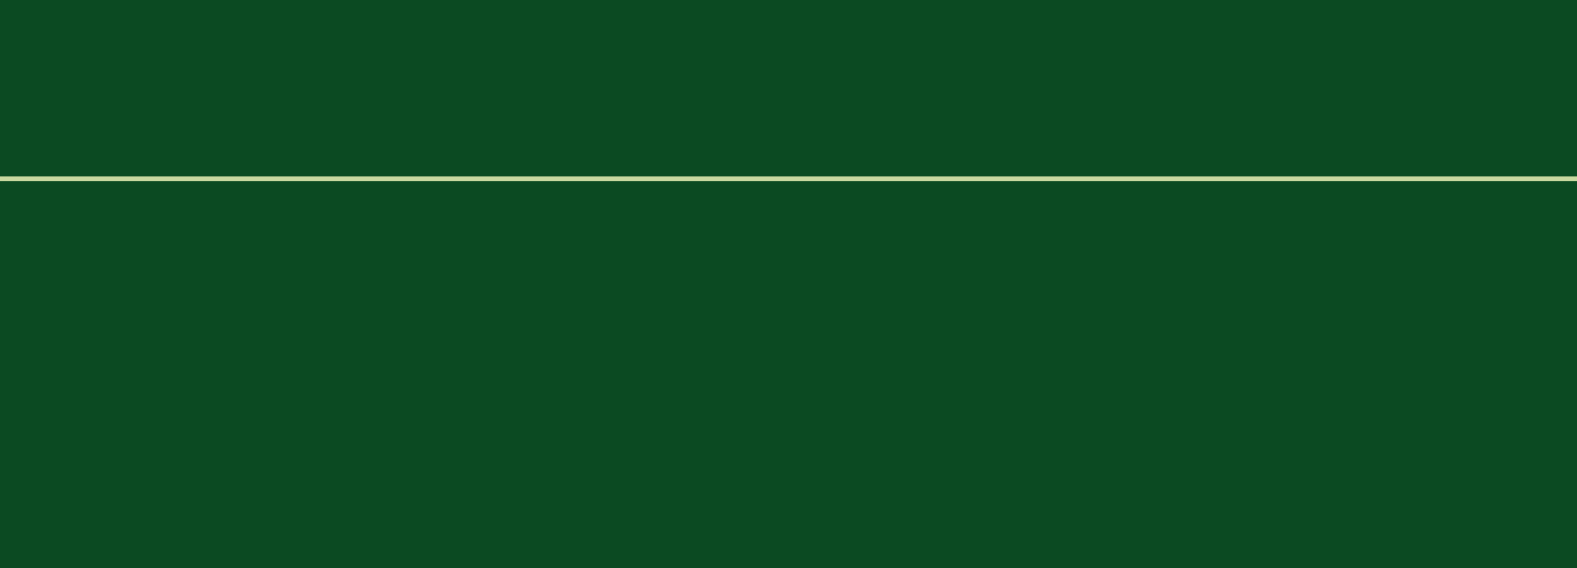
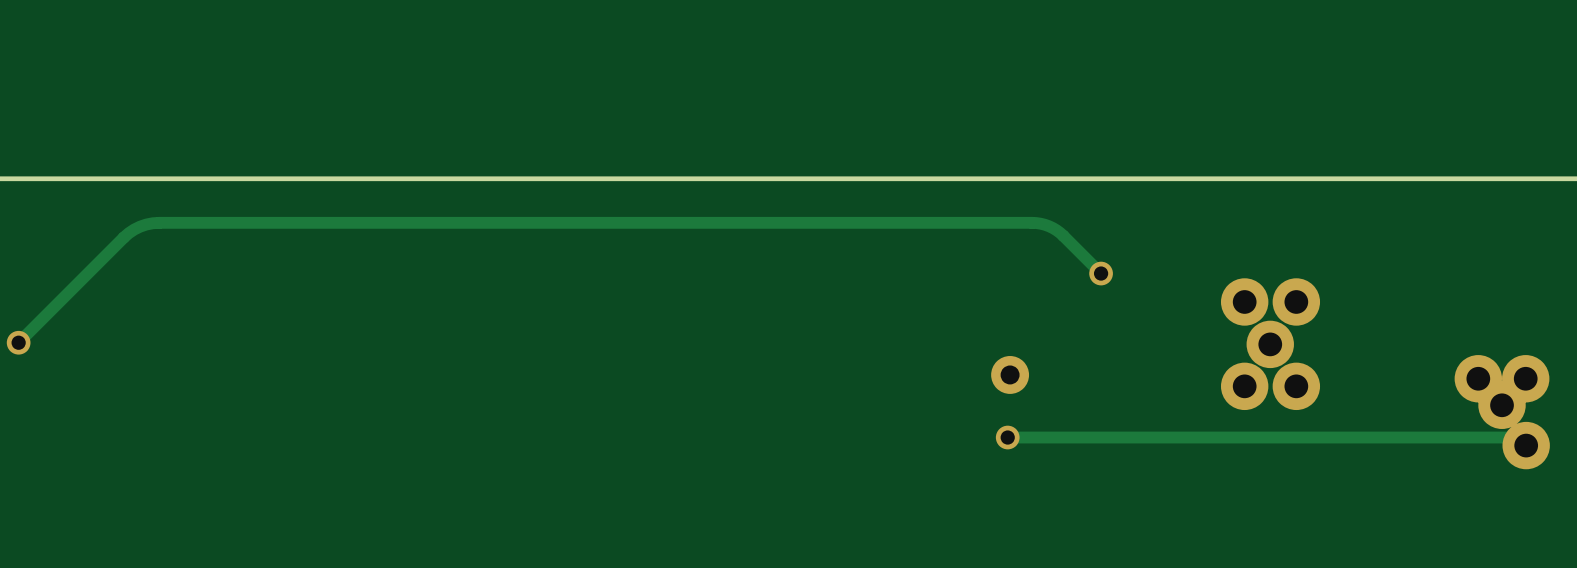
track: none -> (1101, 273) (1060, 232) (1048, 226) (1036, 223) (159, 222) (146, 224) (128, 233) (18, 342)
via: none -> (1101, 273)
via: none -> (1244, 301)
via: none -> (1296, 301)
via: none -> (18, 342)
via: none -> (1270, 344)
via: none -> (1010, 374)
via: none -> (1478, 378)
via: none -> (1525, 378)
via: none -> (1244, 386)
via: none -> (1296, 386)
via: none -> (1502, 405)
track: none -> (1007, 437) (1518, 437) (1523, 439) (1526, 445)
via: none -> (1007, 437)
via: none -> (1526, 445)

